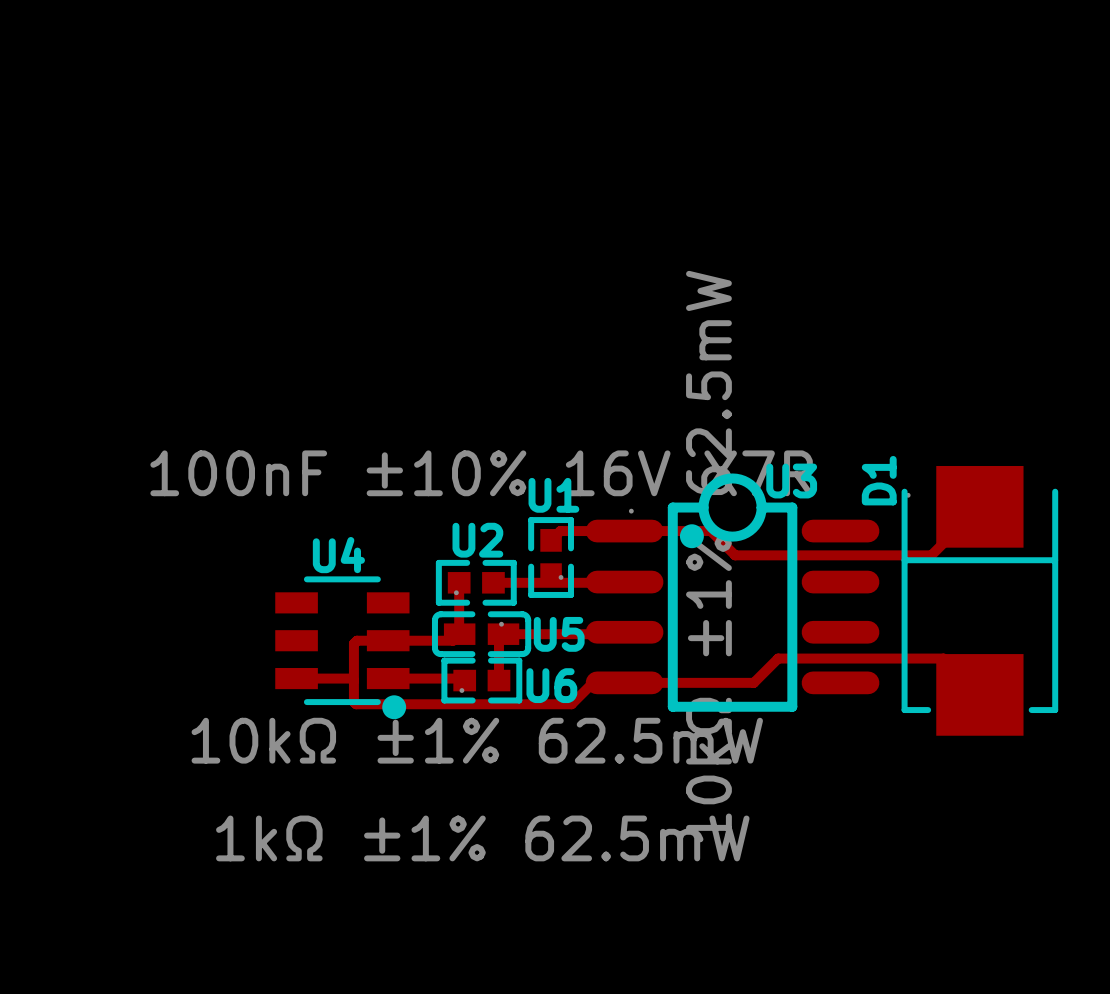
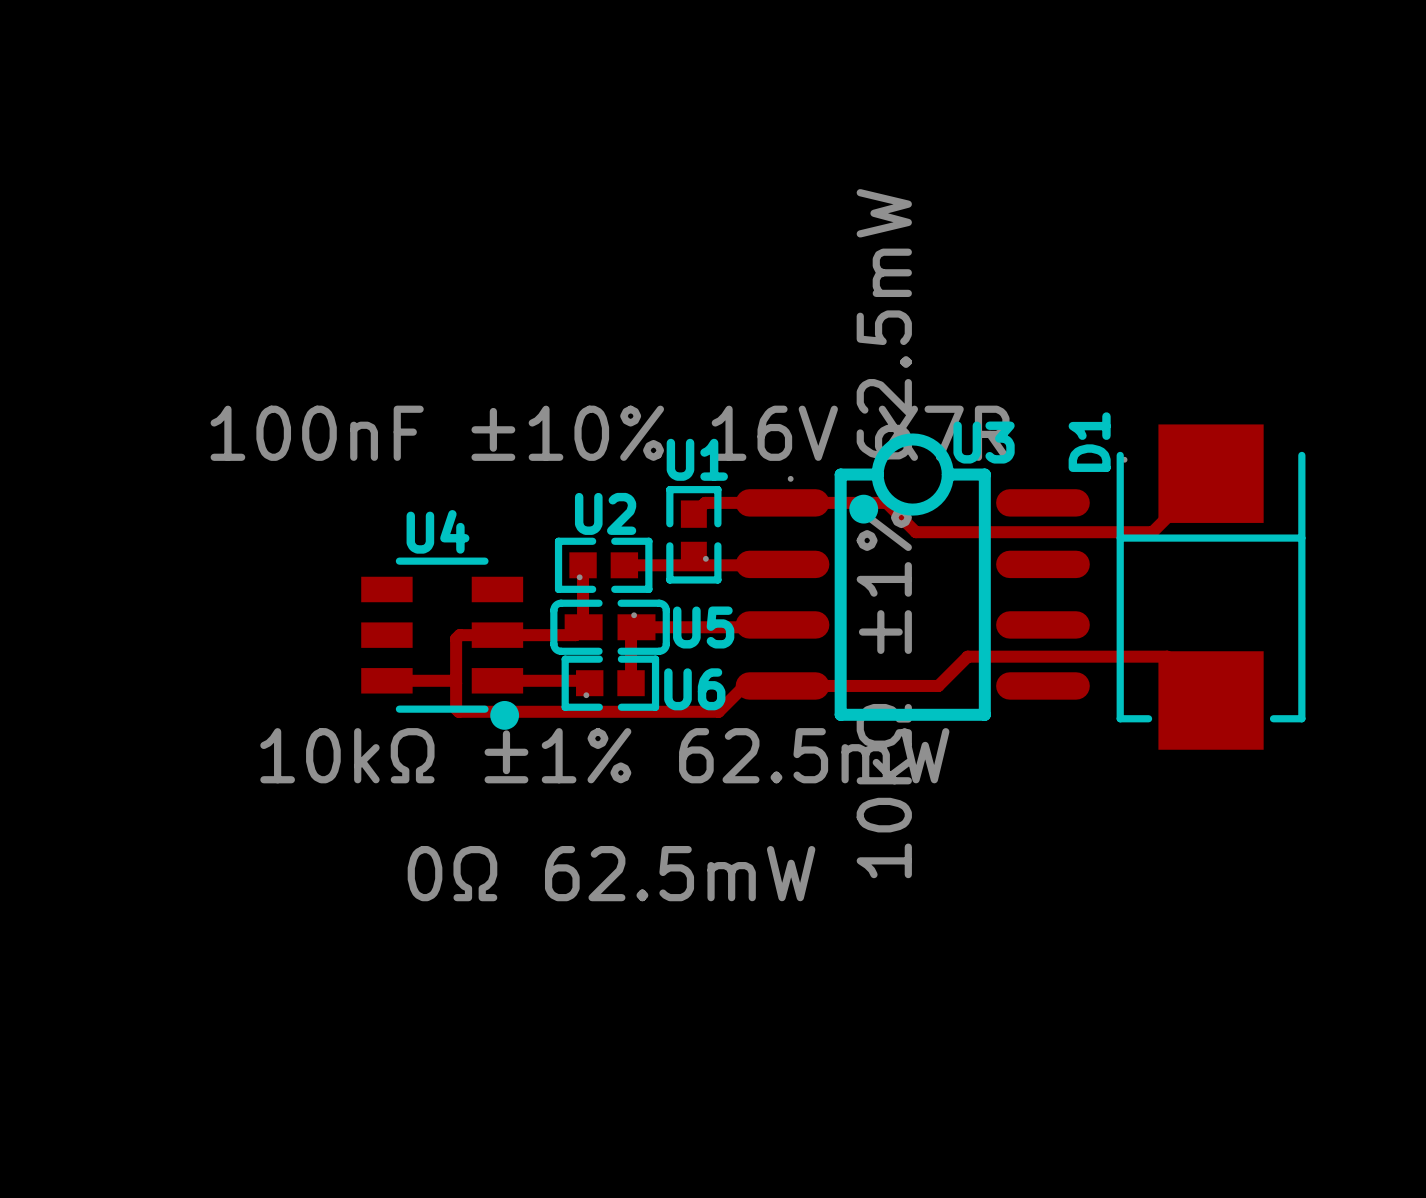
U6 value: 1kΩ ±1% 62.5mW (482, 838) -> 0Ω 62.5mW (611, 873)

